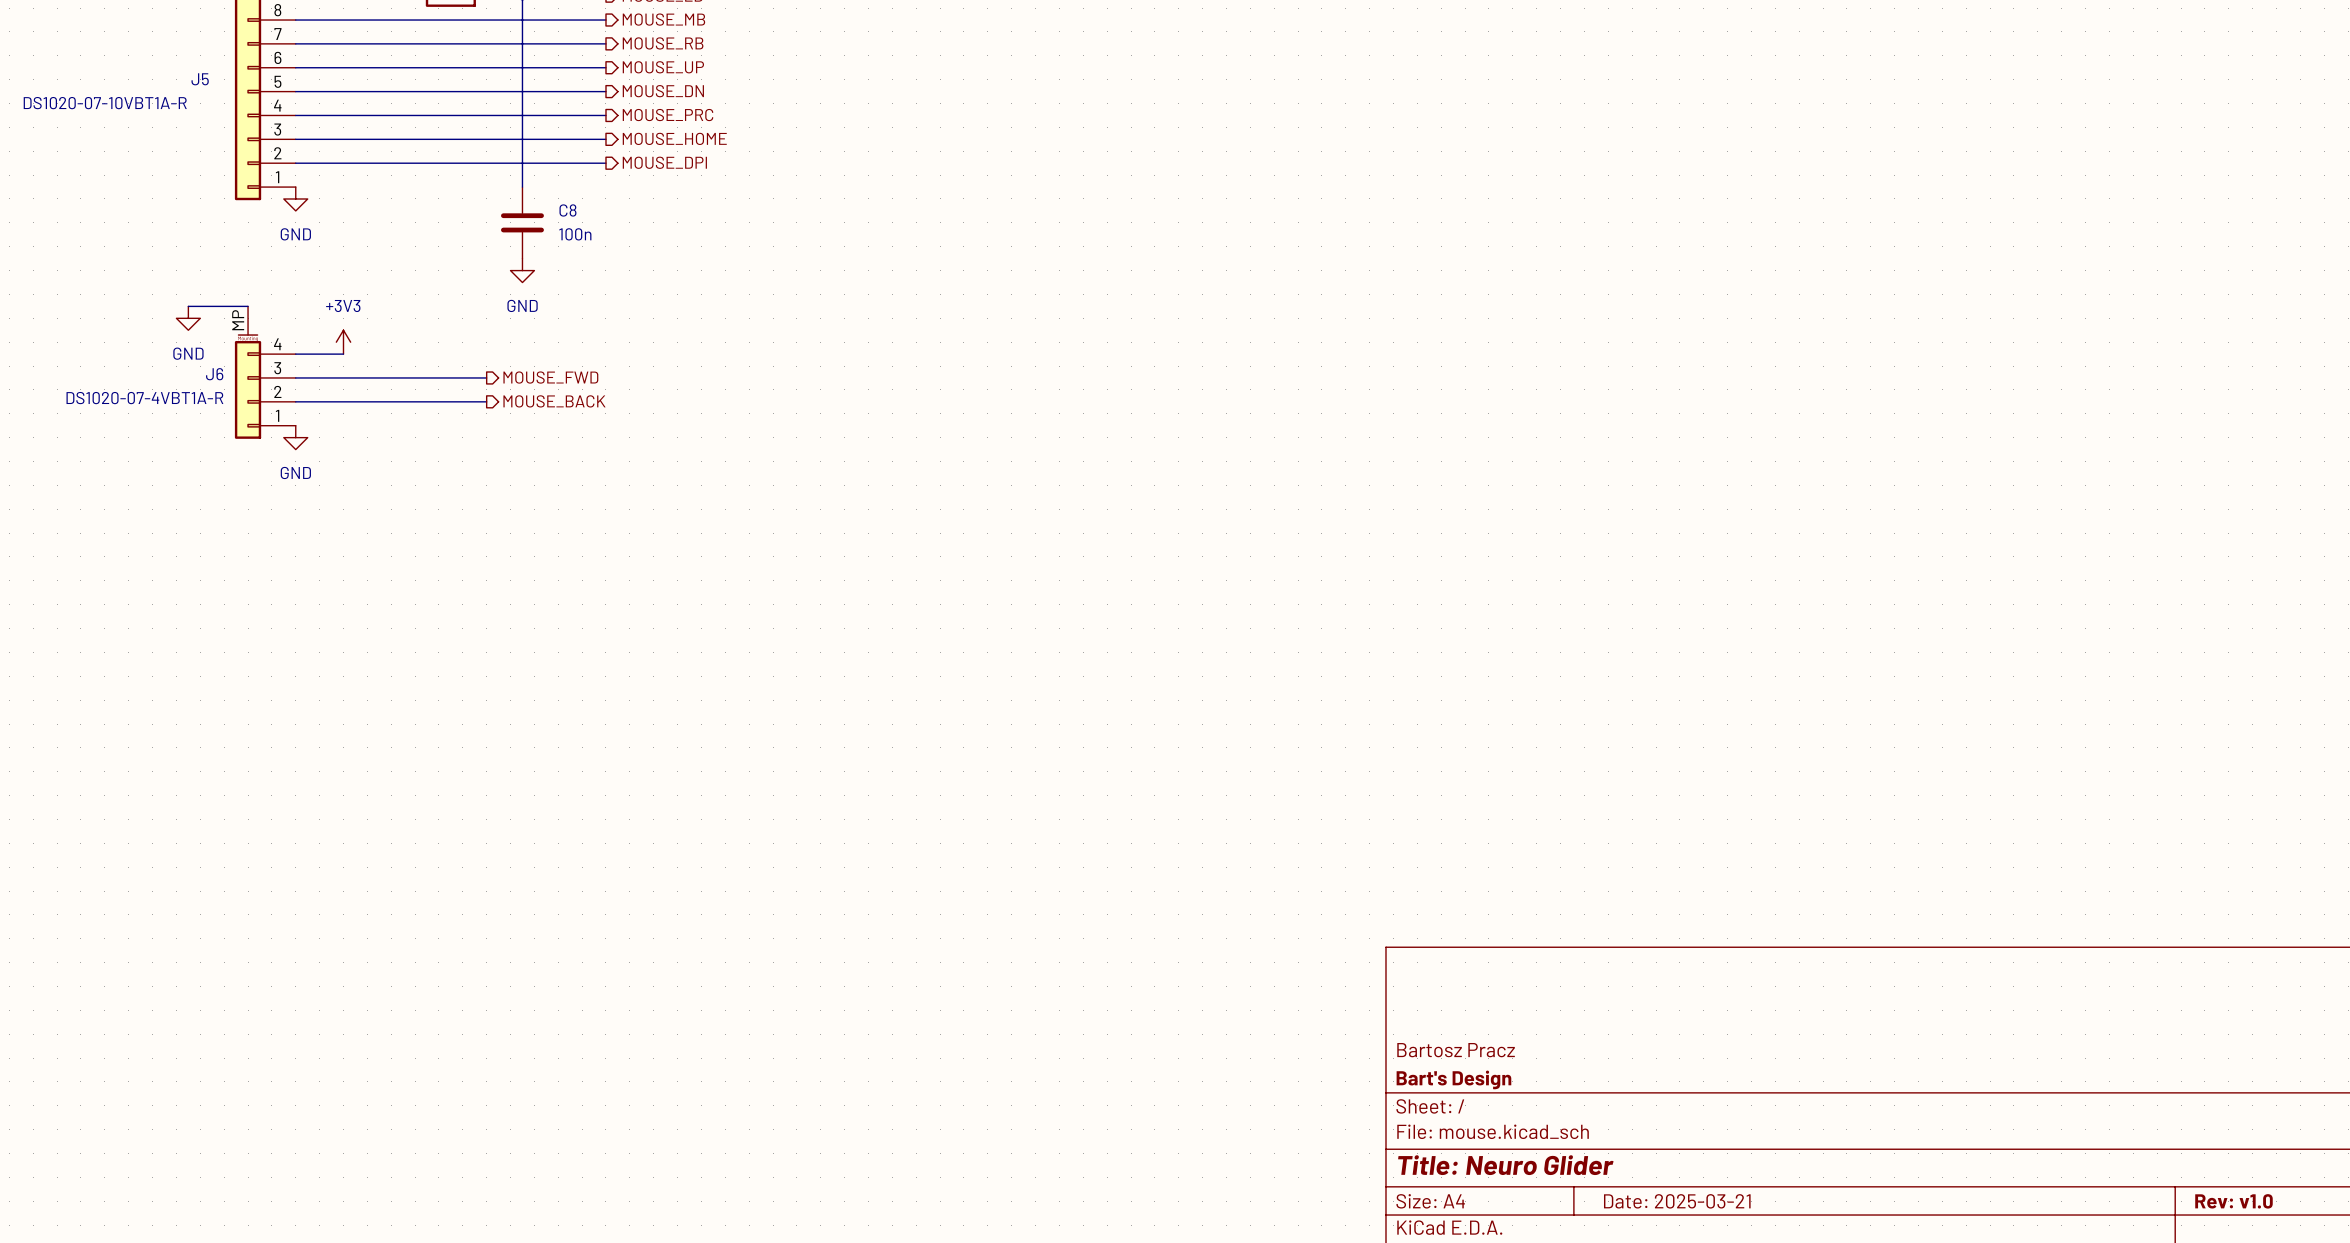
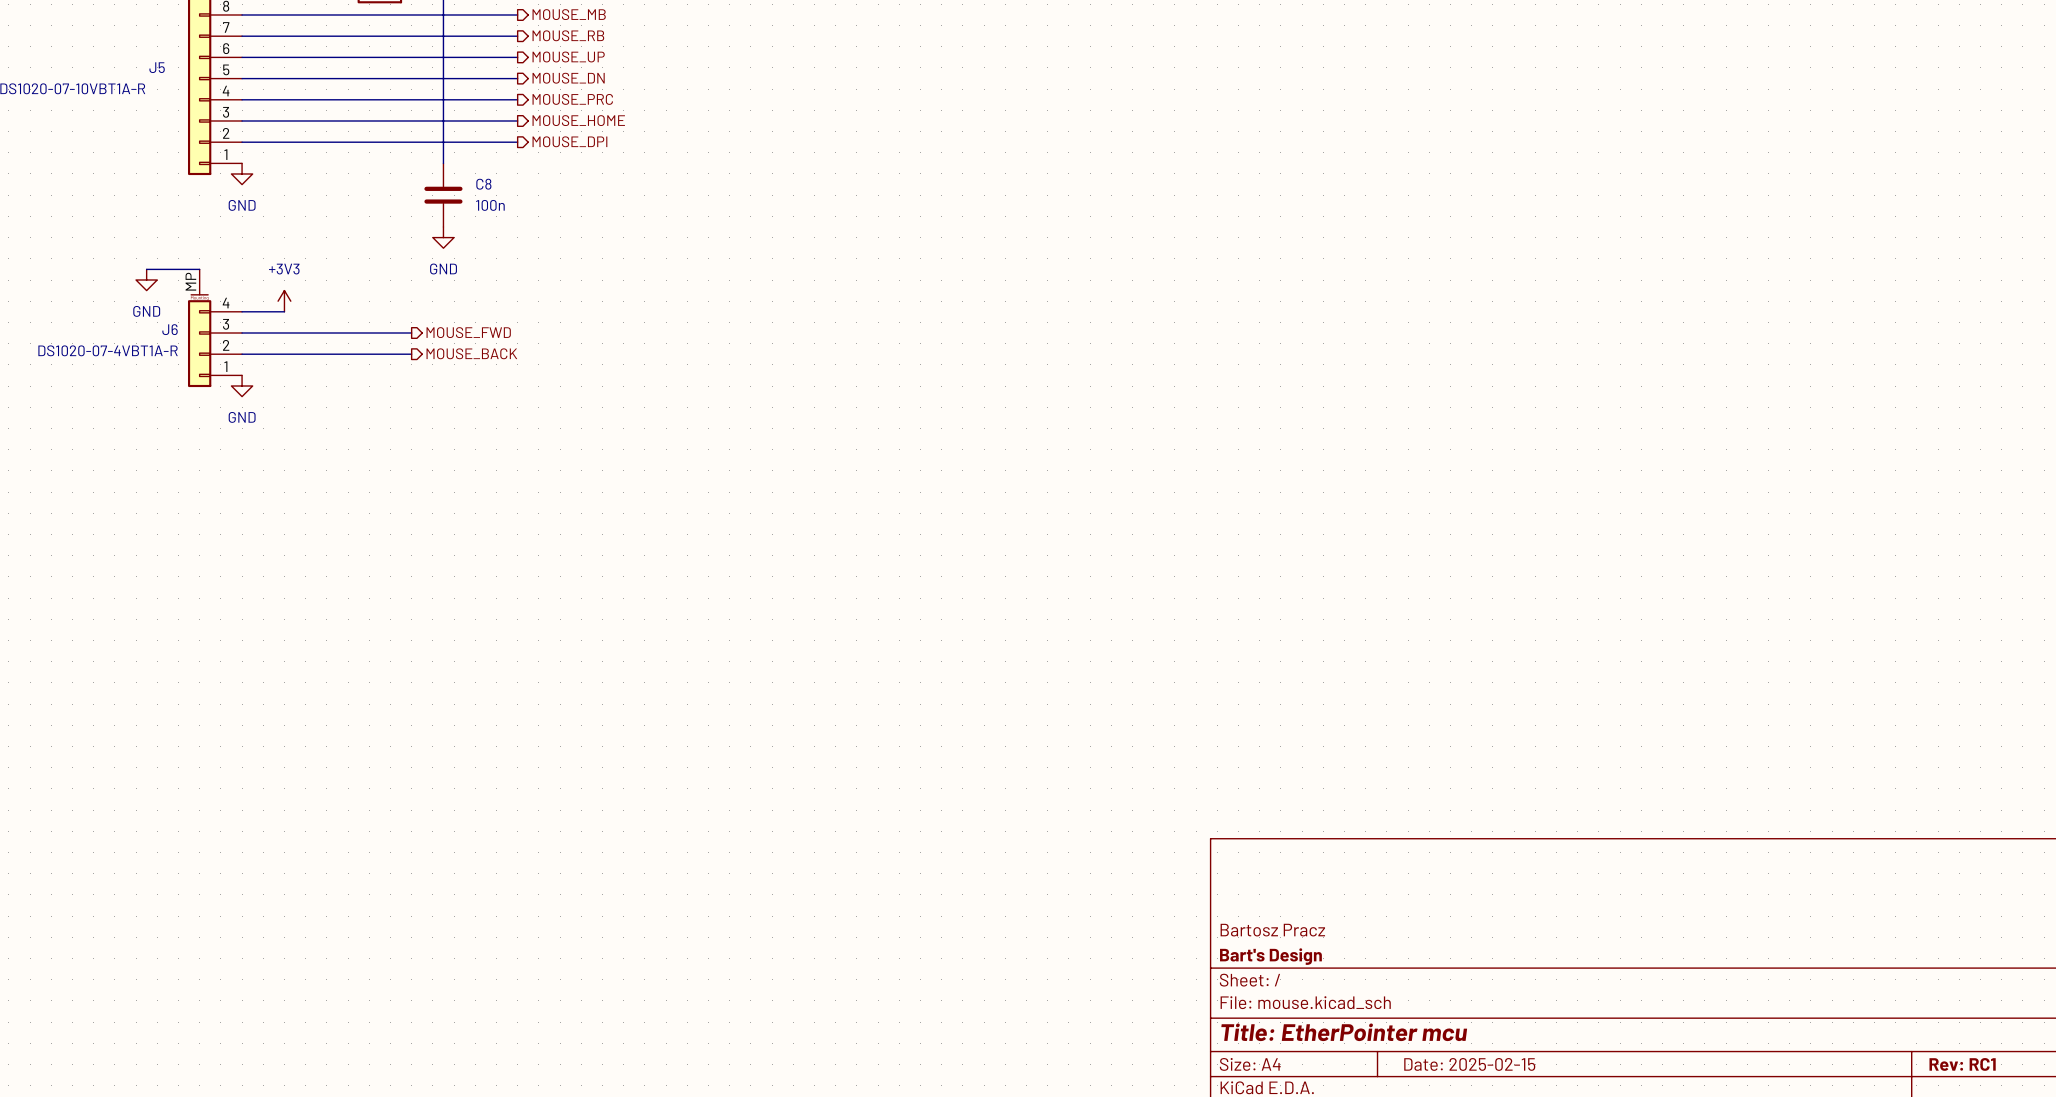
title block: Title: Neuro Glider (1505, 1165) -> Title: EtherPointer mcu (1344, 1032)
title block: Date: 2025-03-21 (1677, 1201) -> Date: 2025-02-15 (1469, 1064)
title block: Rev: v1.0 (2233, 1201) -> Rev: RC1 (1962, 1064)

